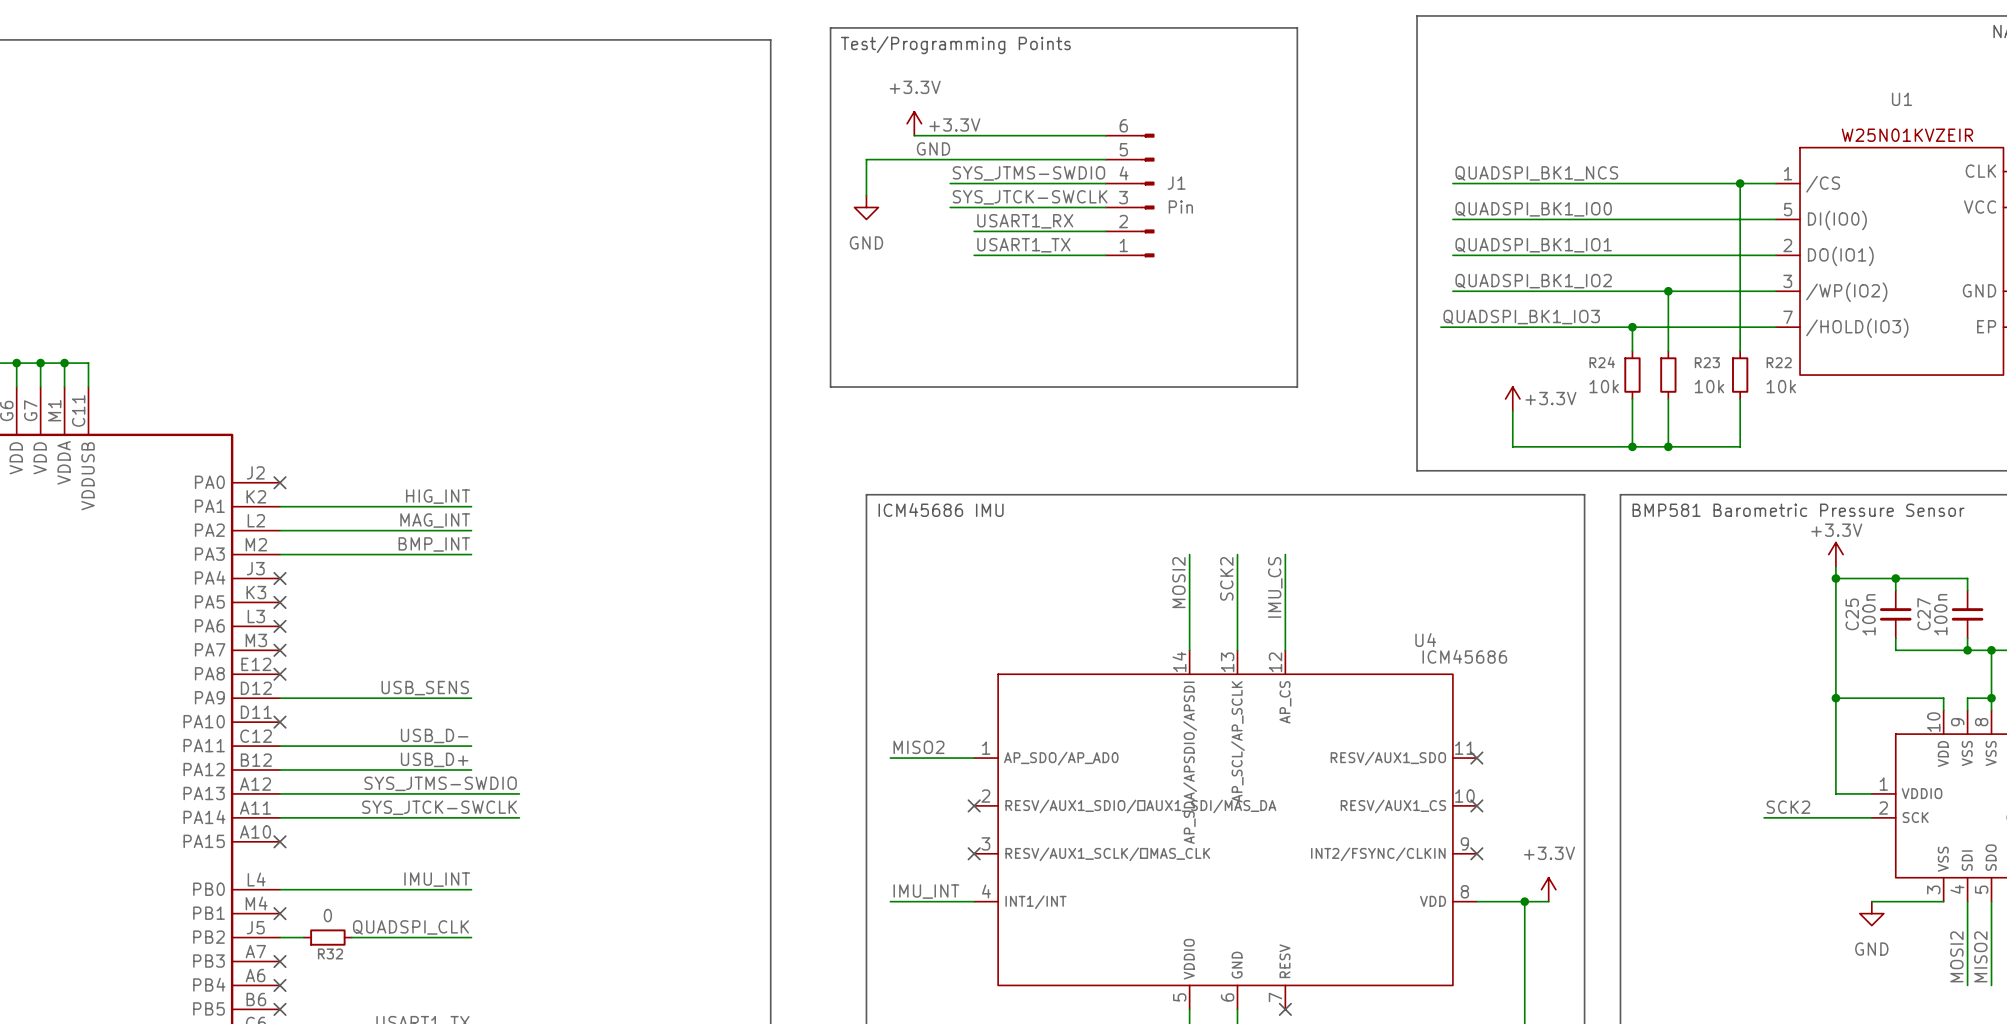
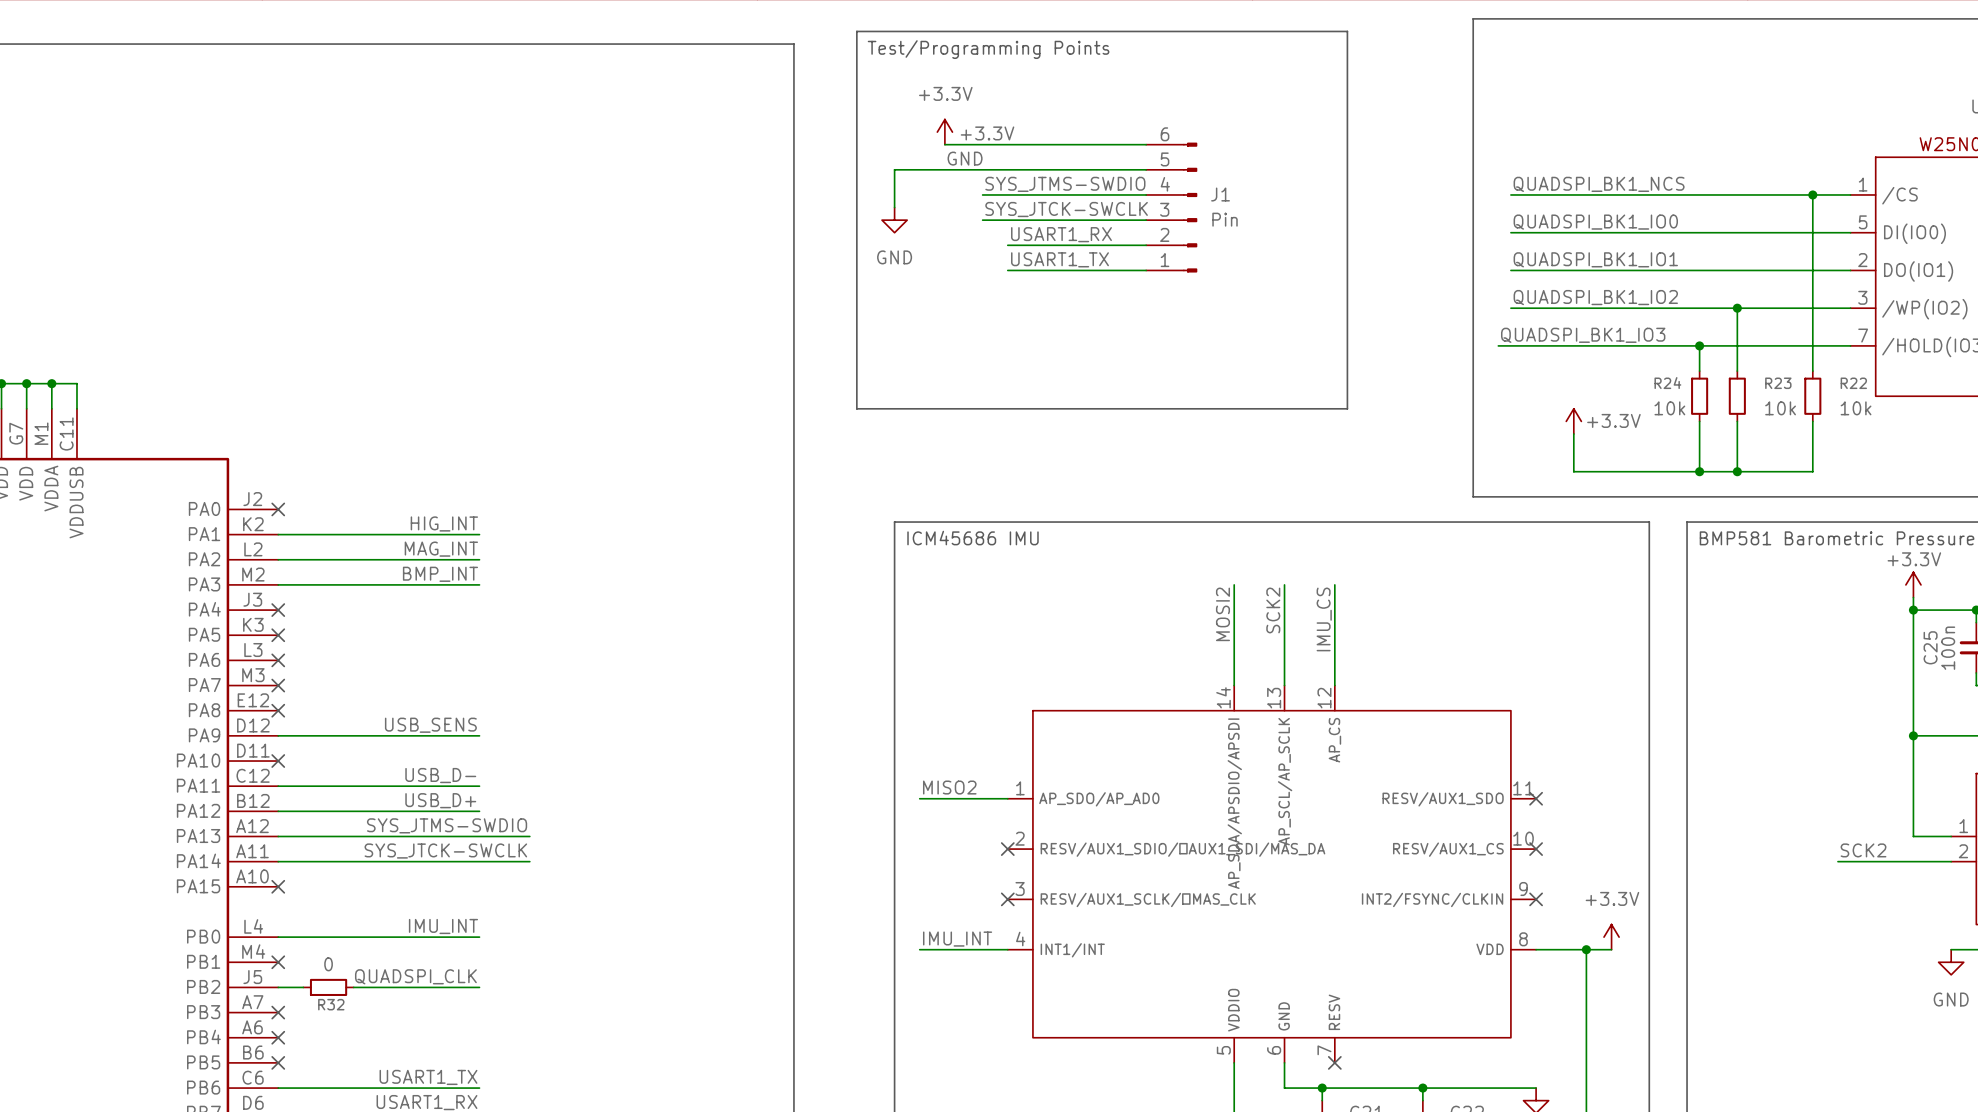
U4 name: U4 (1425, 640) -> none
U4 value: ICM45686 (1464, 656) -> none

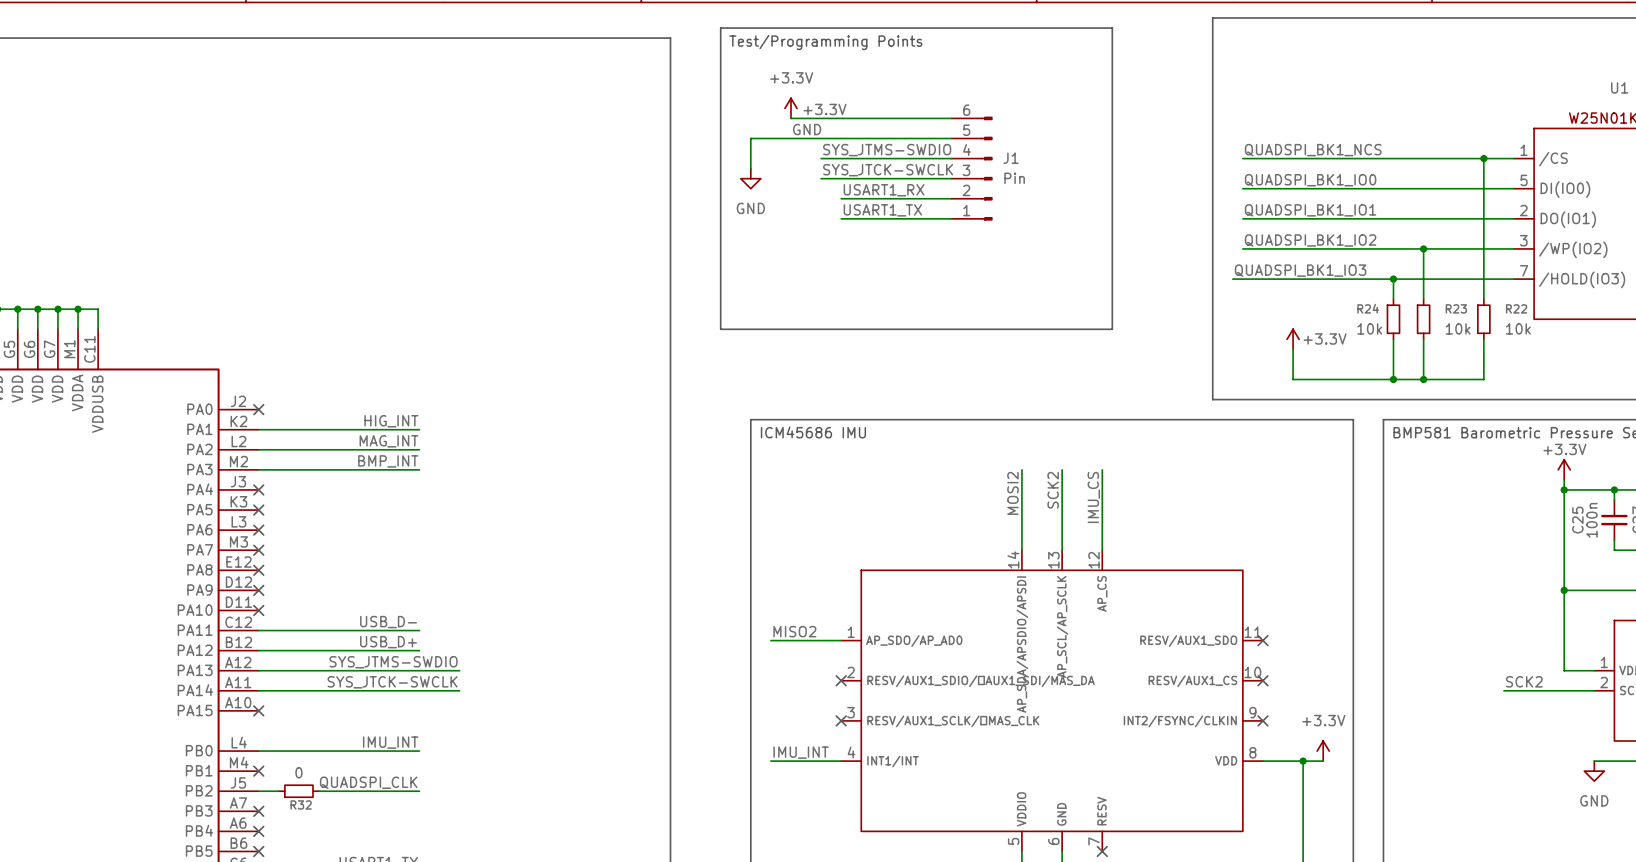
label: USB_SENS (430, 725) -> none
wire: (278, 735) (479, 735) -> none
no-connect mark: none -> (258, 590)

